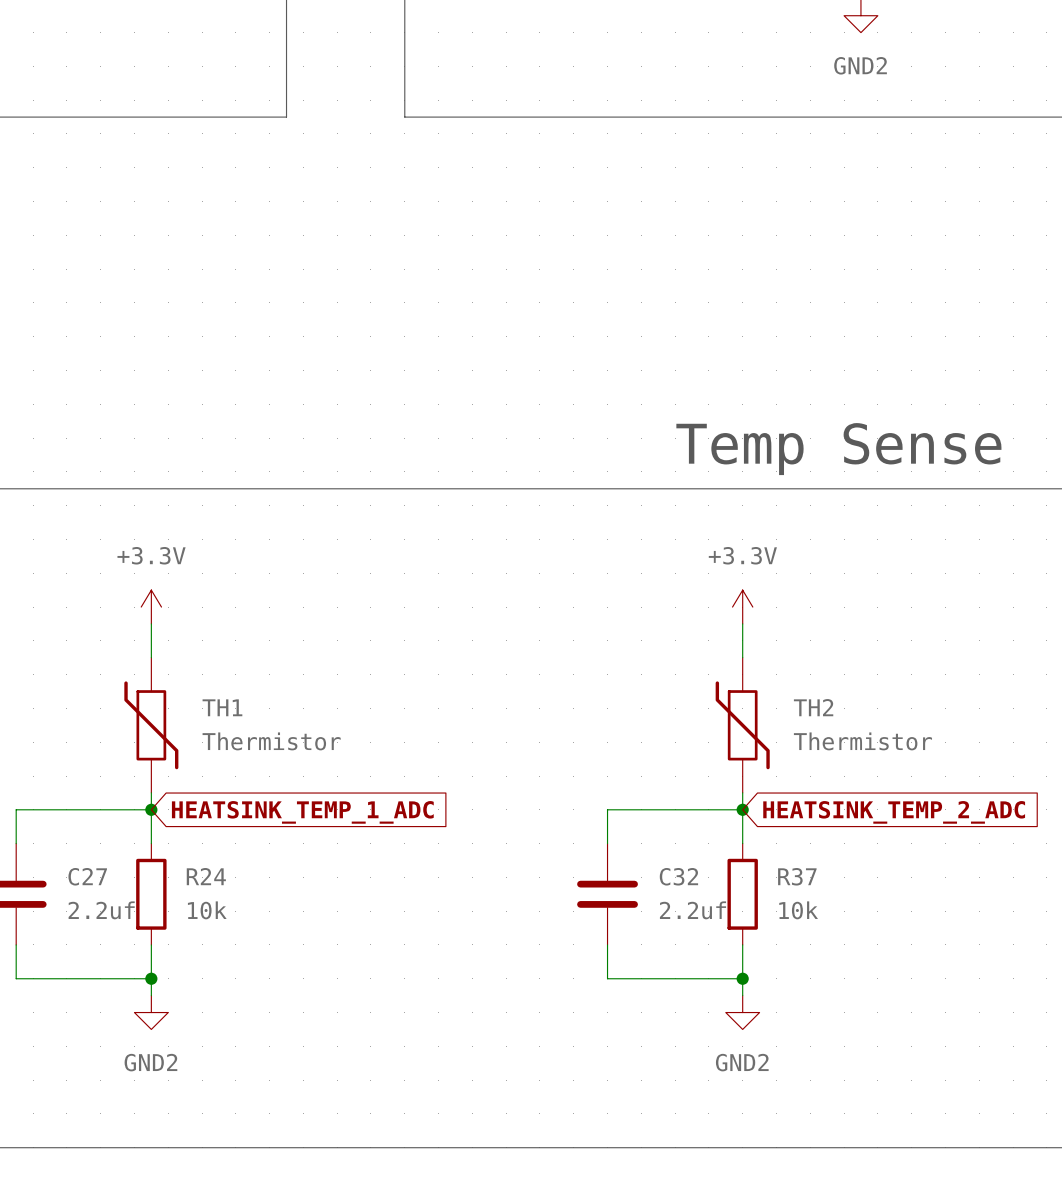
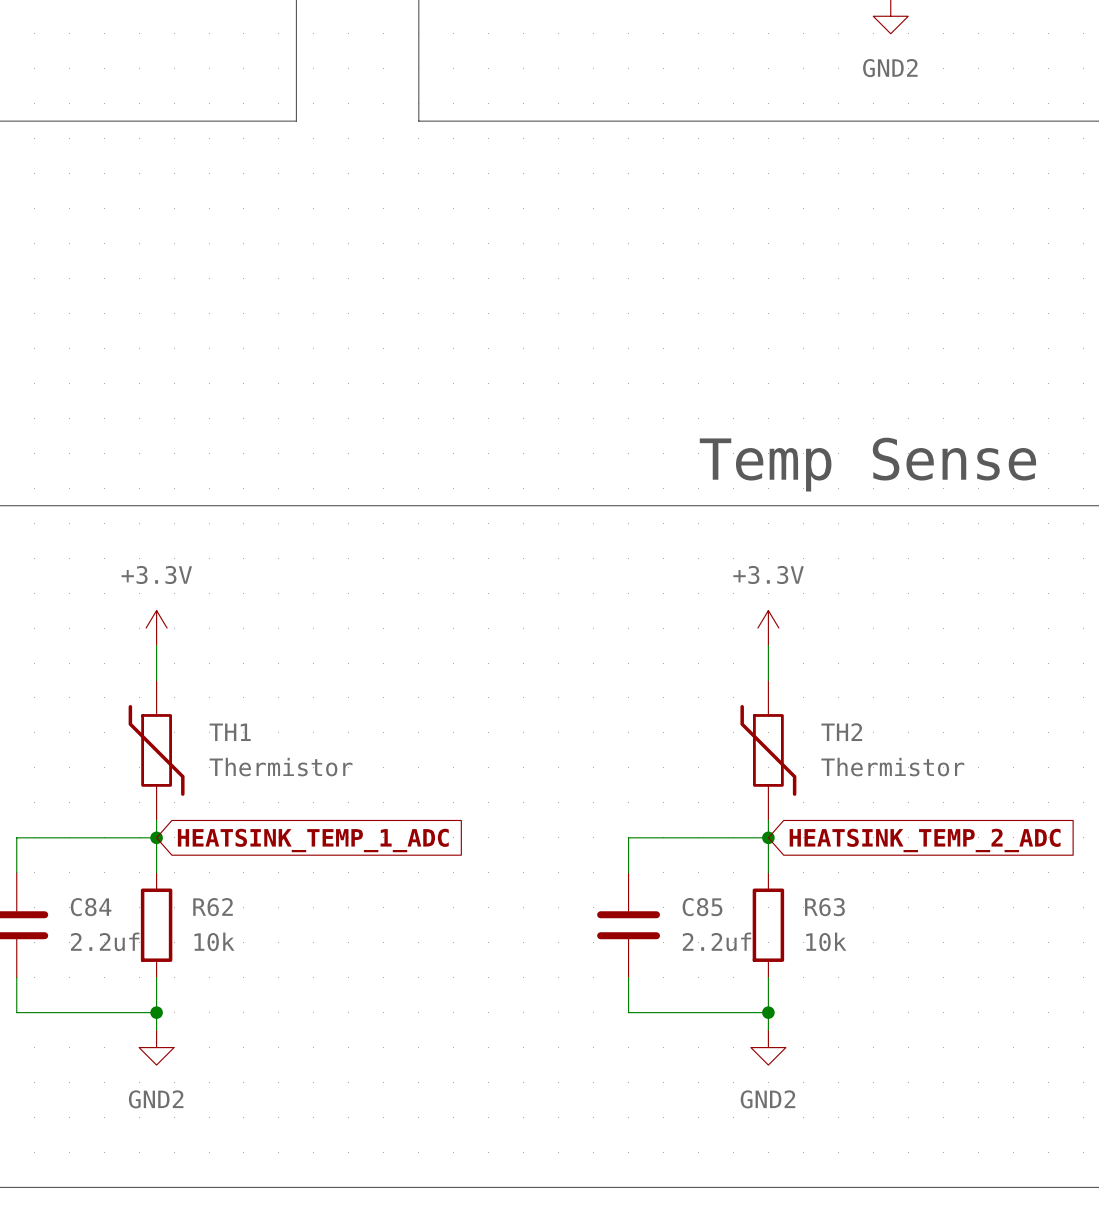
C27 name: C27 (87, 876) -> C84 (91, 907)
R24 name: R24 (206, 876) -> R62 (213, 907)
C32 name: C32 (678, 876) -> C85 (702, 907)
R37 name: R37 (797, 876) -> R63 (824, 907)

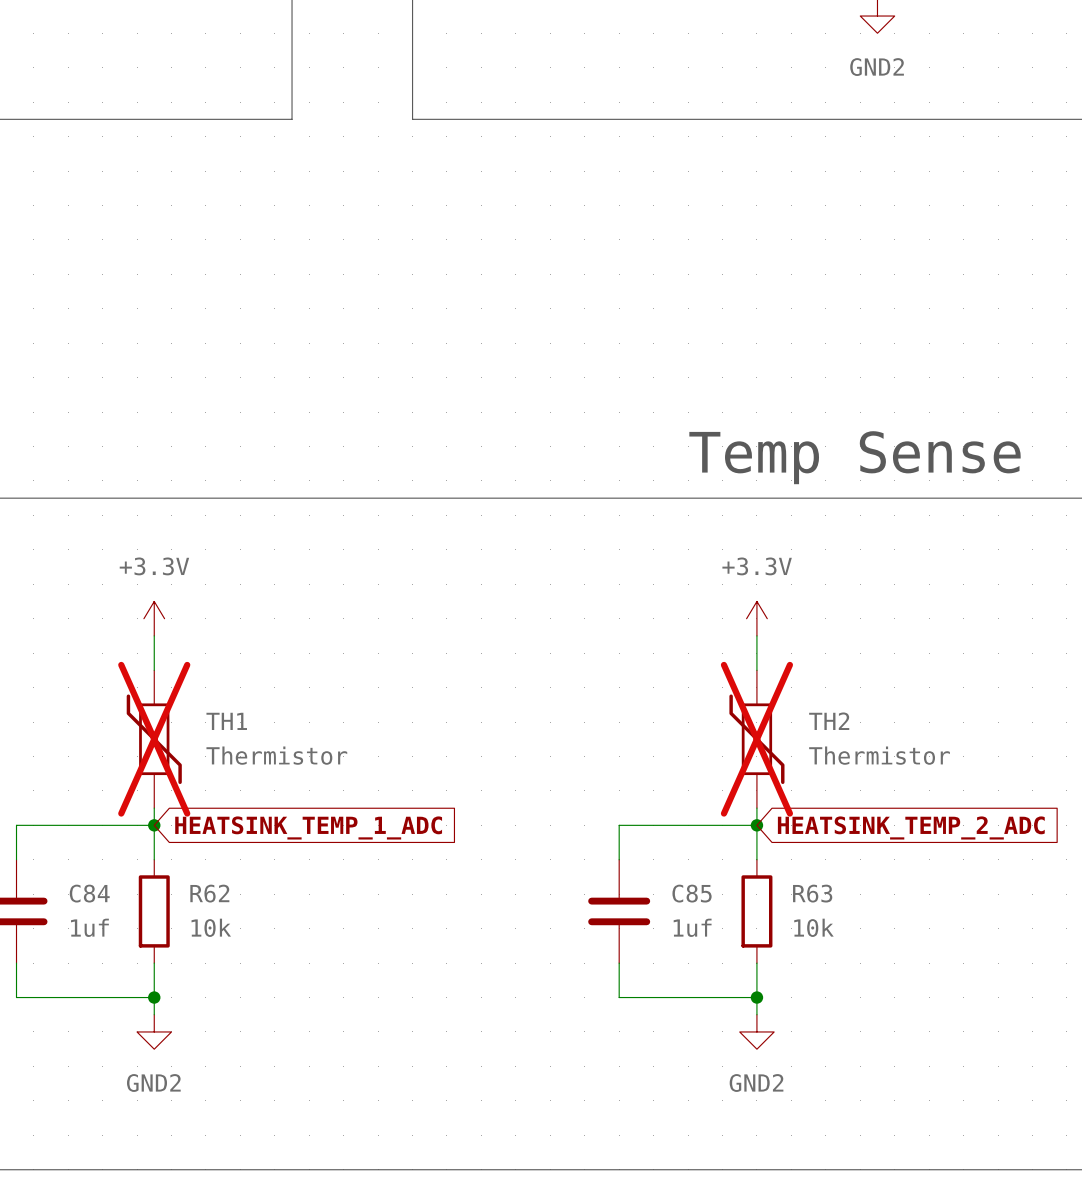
TH1 do-not-place cross: none -> (154, 739)
TH2 do-not-place cross: none -> (756, 739)
C84 value: 2.2uf (105, 941) -> 1uf (89, 927)
C85 value: 2.2uf (716, 941) -> 1uf (692, 927)

